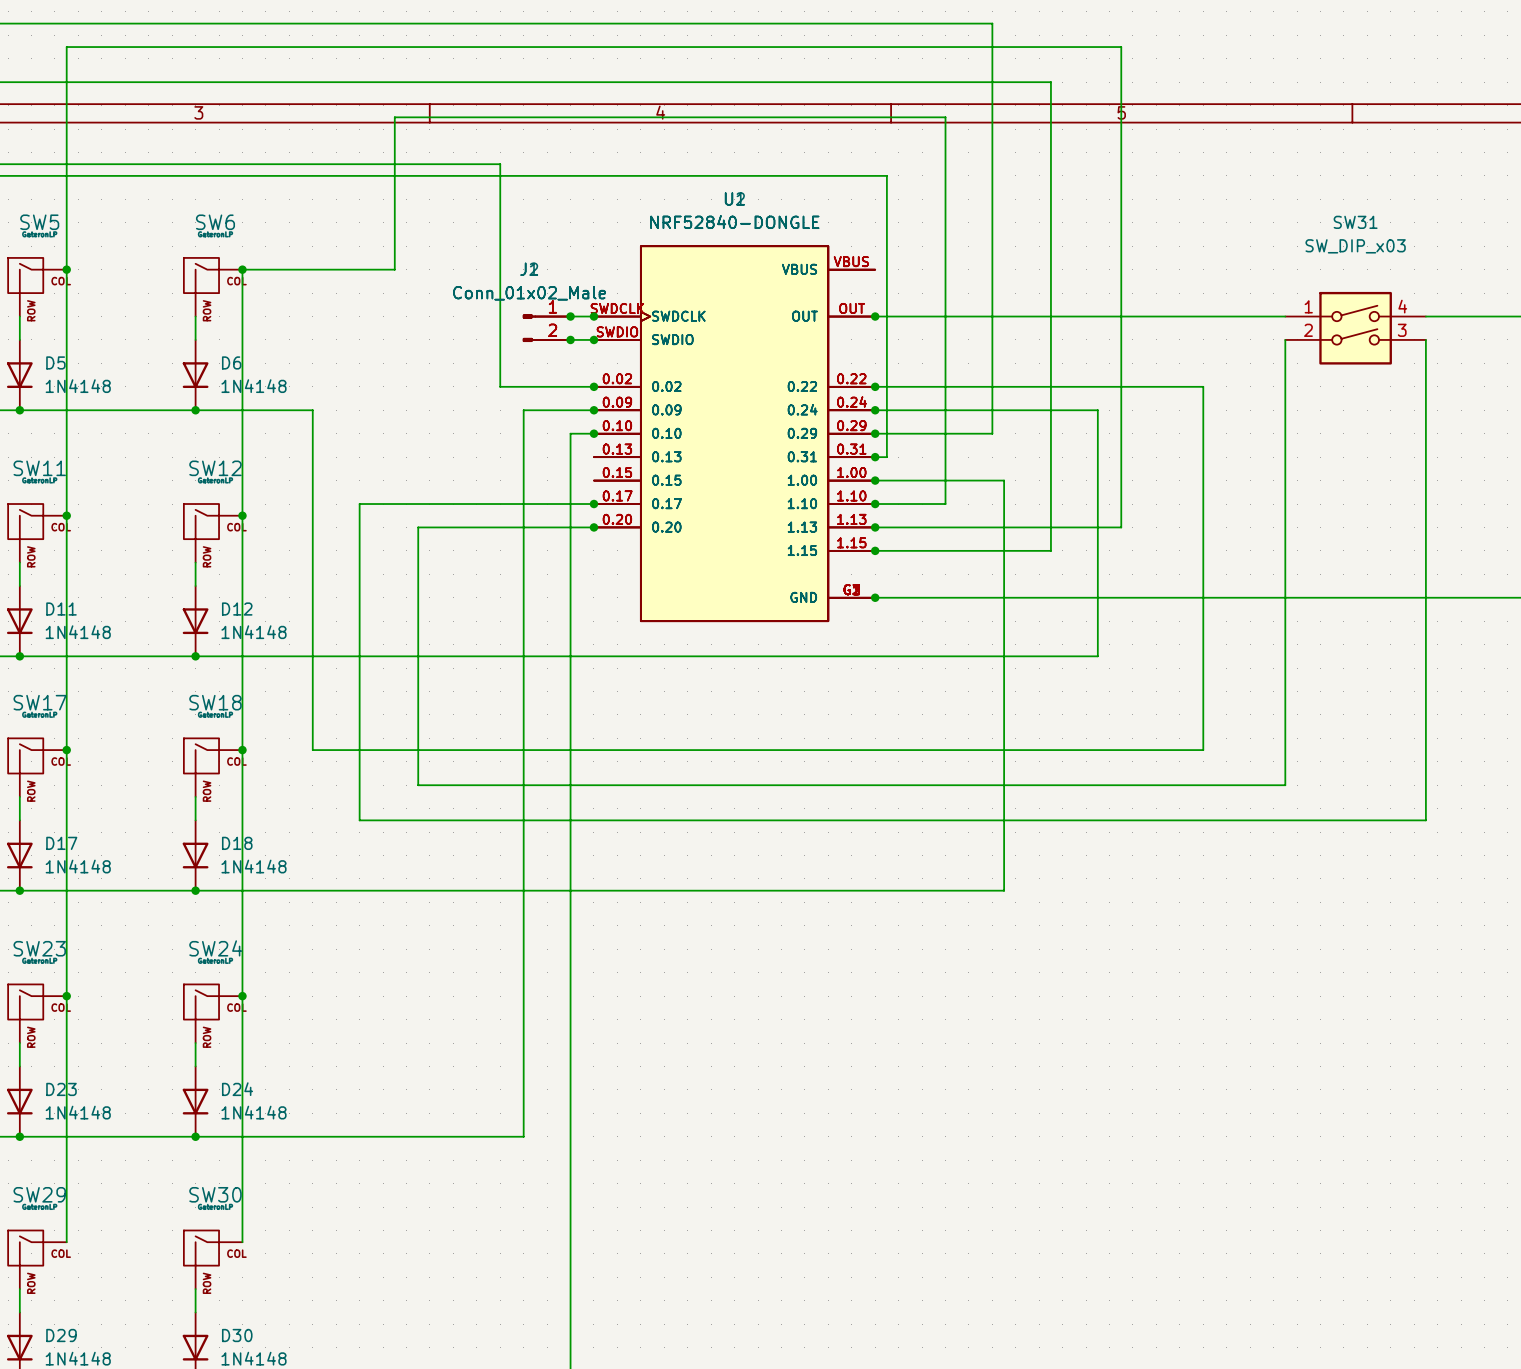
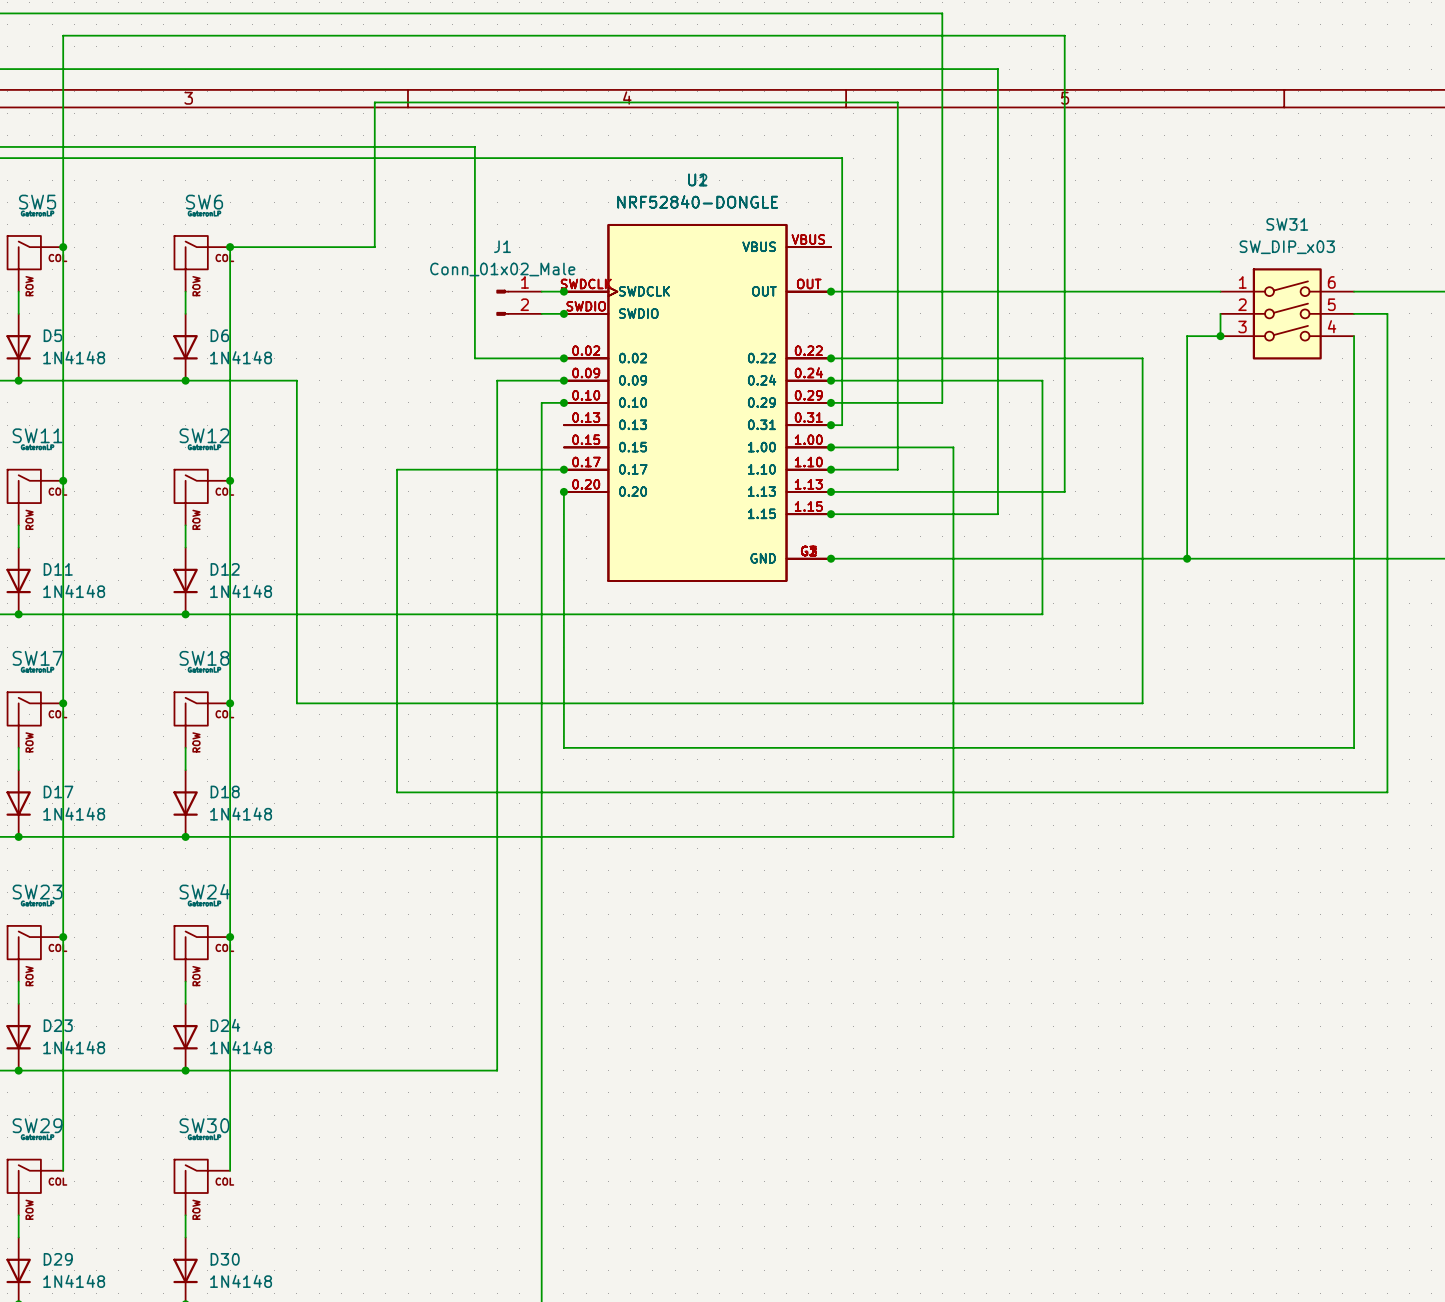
SW31 symbol: [1285, 291, 1426, 365] -> [1220, 268, 1355, 360]
junction: (570, 316) -> none
part: Conn_01x02_Male (546, 328) -> none
junction: (570, 339) -> none
wire: (1425, 339) (1425, 363) -> none
wire: (1285, 363) (1285, 785) (418, 785) -> (1354, 313) (1387, 313) (1387, 792) (397, 792) (397, 736)
wire: none -> (1220, 336) (1187, 336) (1187, 558)
junction: none -> (1220, 336)
wire: (418, 504) (359, 504) (359, 820) (1425, 820) (1425, 796) -> (563, 491) (563, 747) (1354, 747)
wire: (418, 527) (593, 527) -> (397, 491) (397, 469)
junction: none -> (1187, 558)

